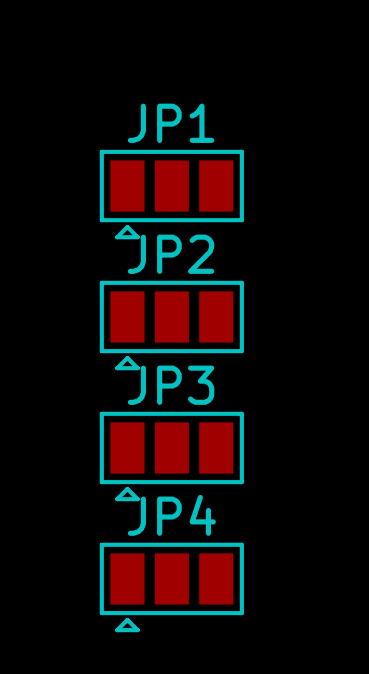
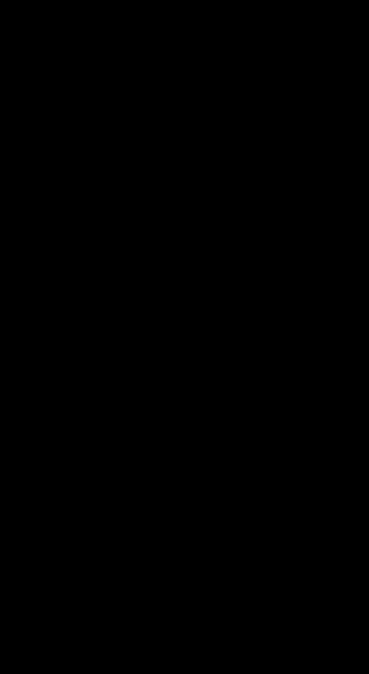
JP1: (171, 194) -> none
JP2: (171, 325) -> none
JP3: (171, 456) -> none
JP4: (171, 587) -> none

